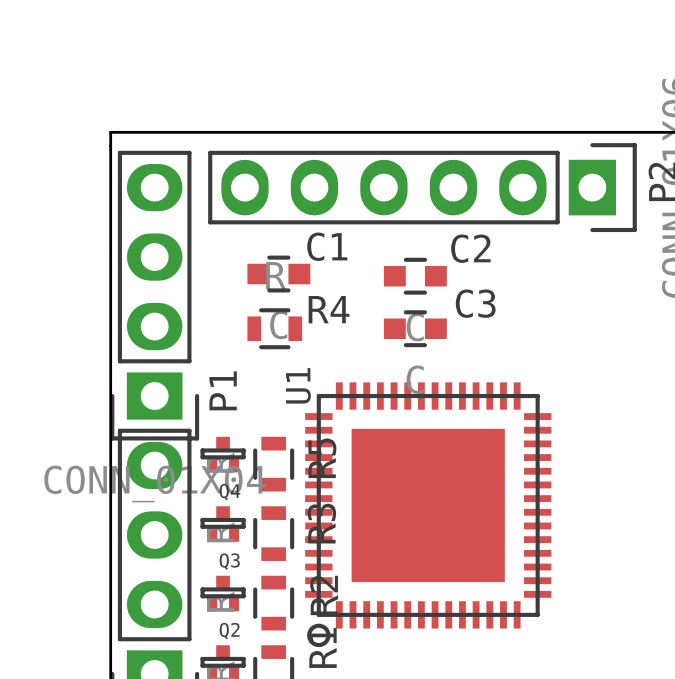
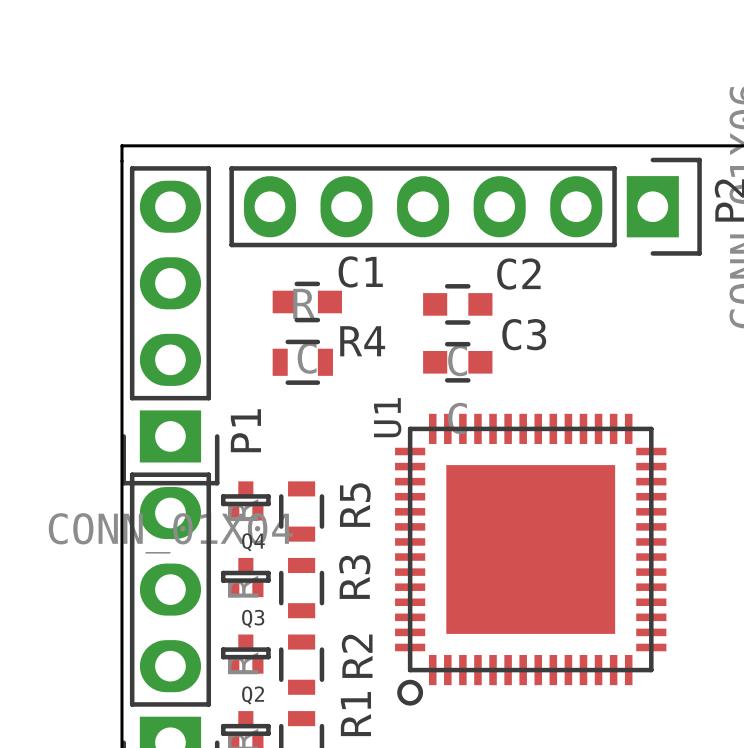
U1 position: (428, 514) -> (530, 559)

